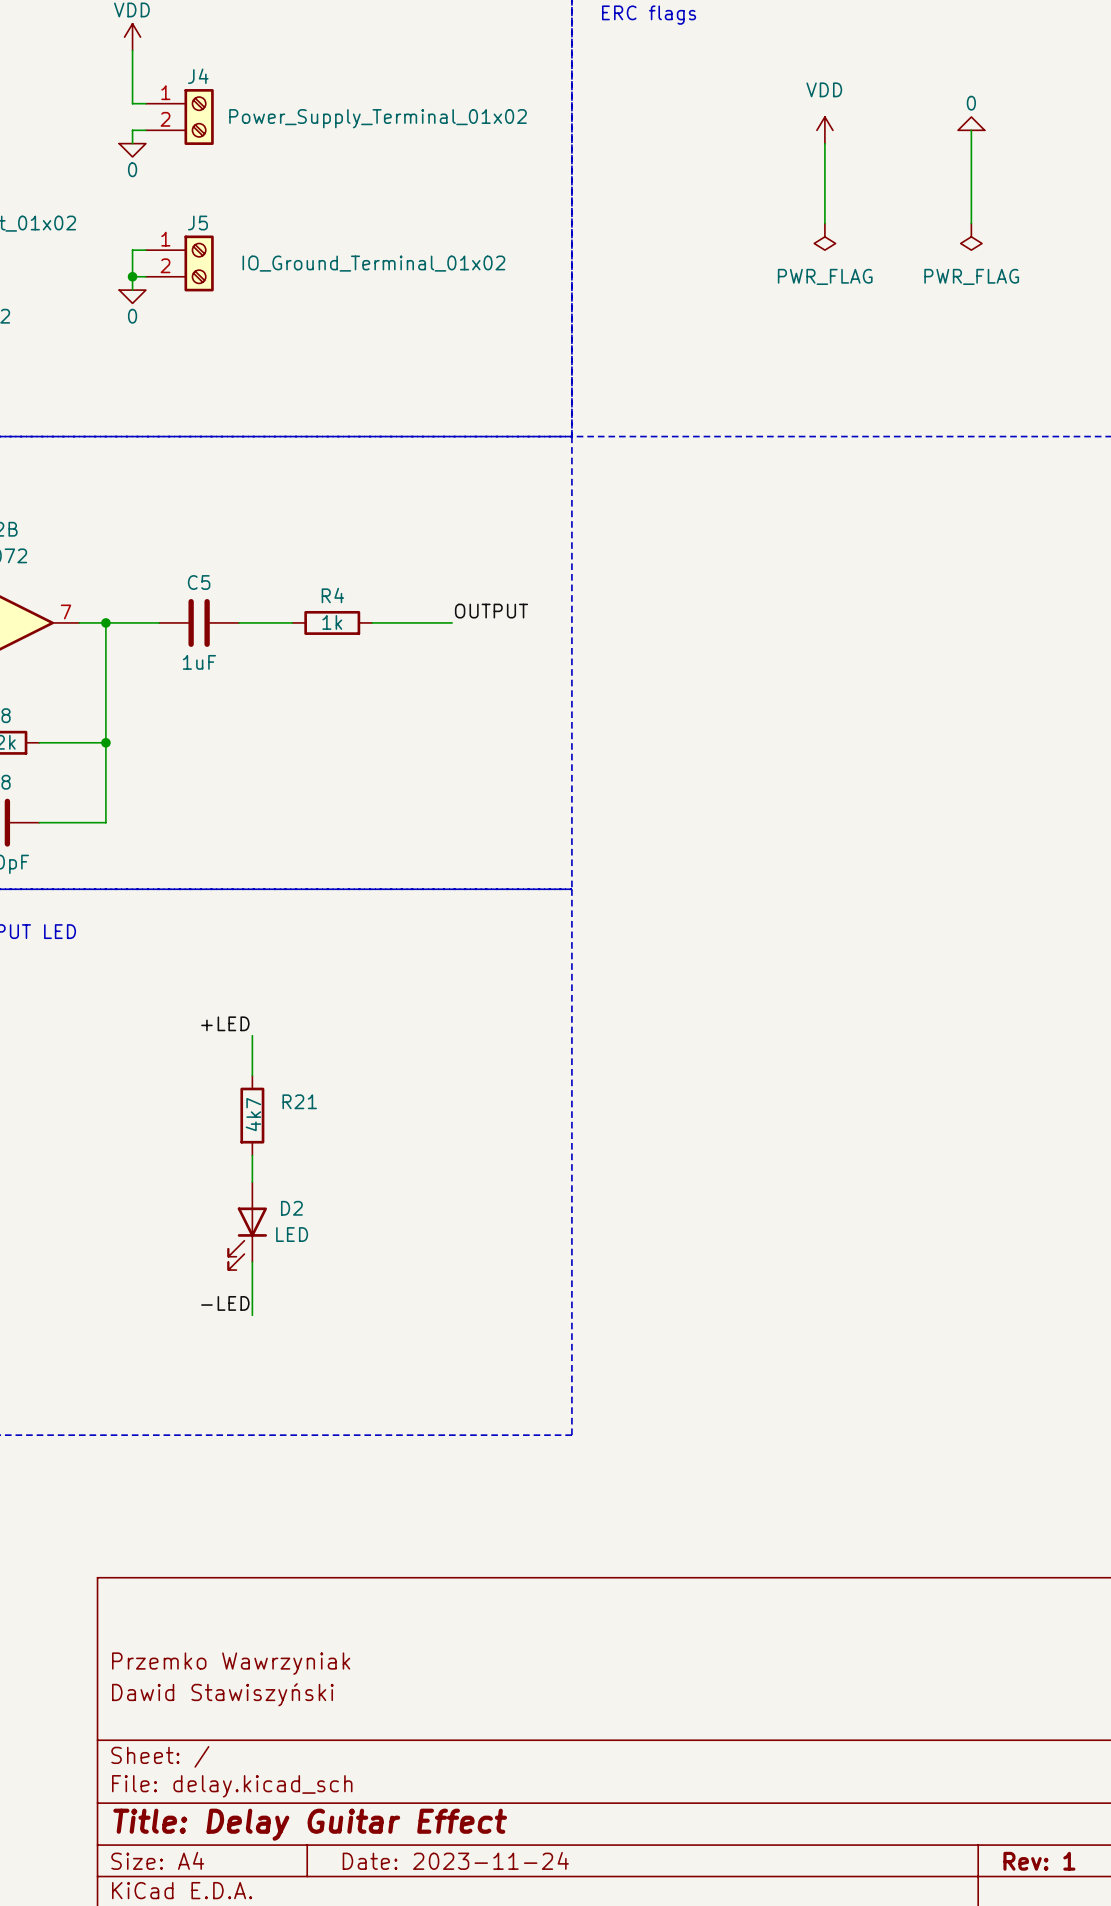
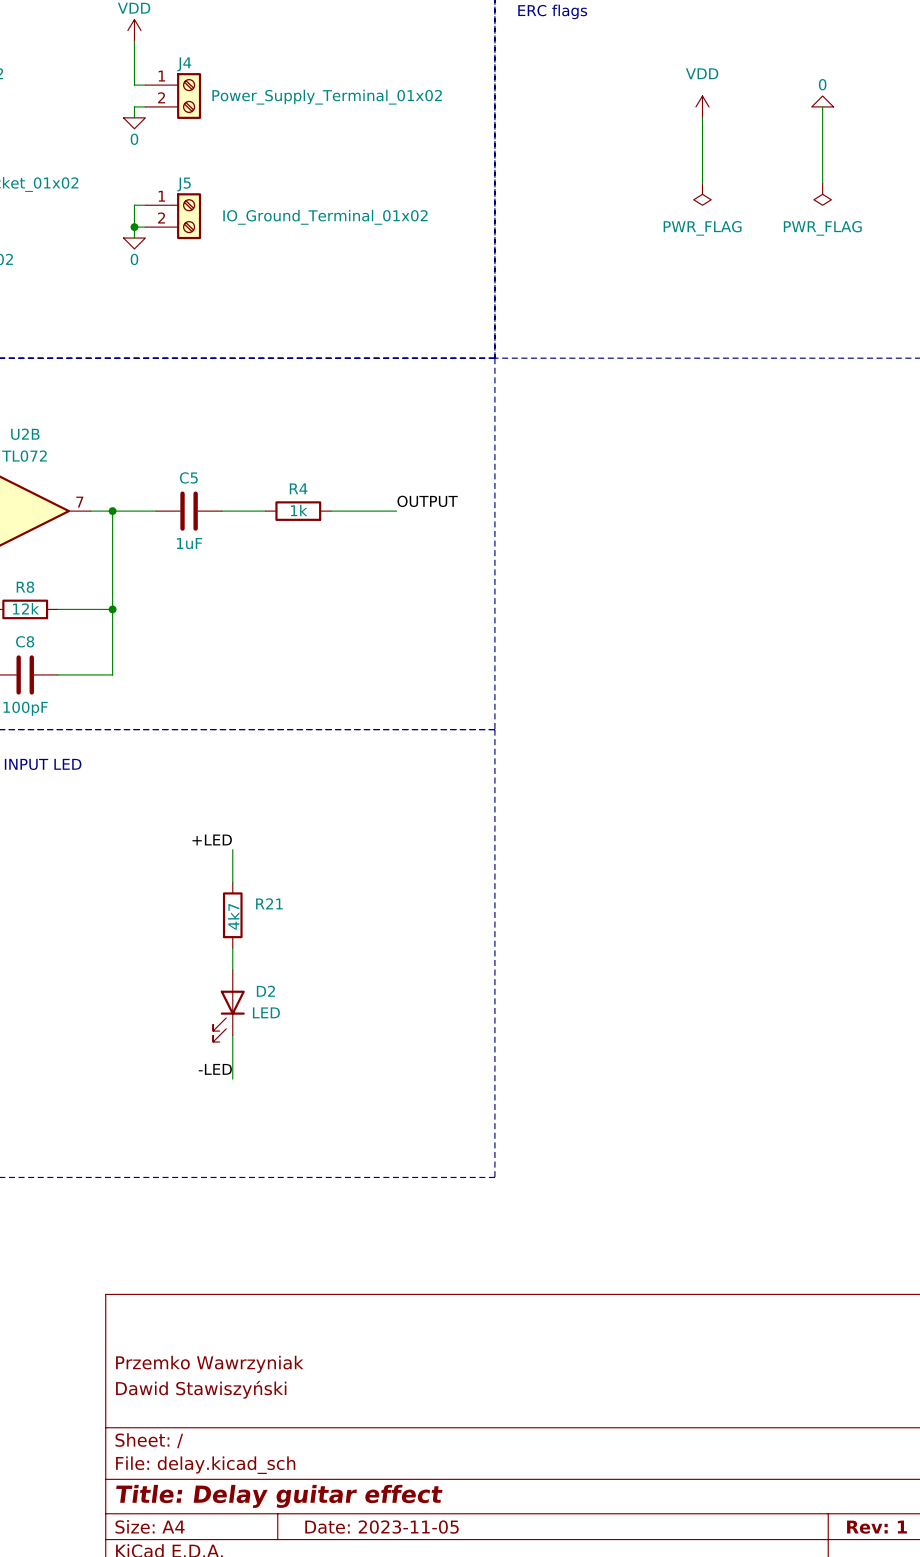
title block: Title: Delay Guitar Effect (310, 1824) -> Title: Delay guitar effect (279, 1496)
title block: Date: 2023-11-24 (455, 1860) -> Date: 2023-11-05 (382, 1527)

